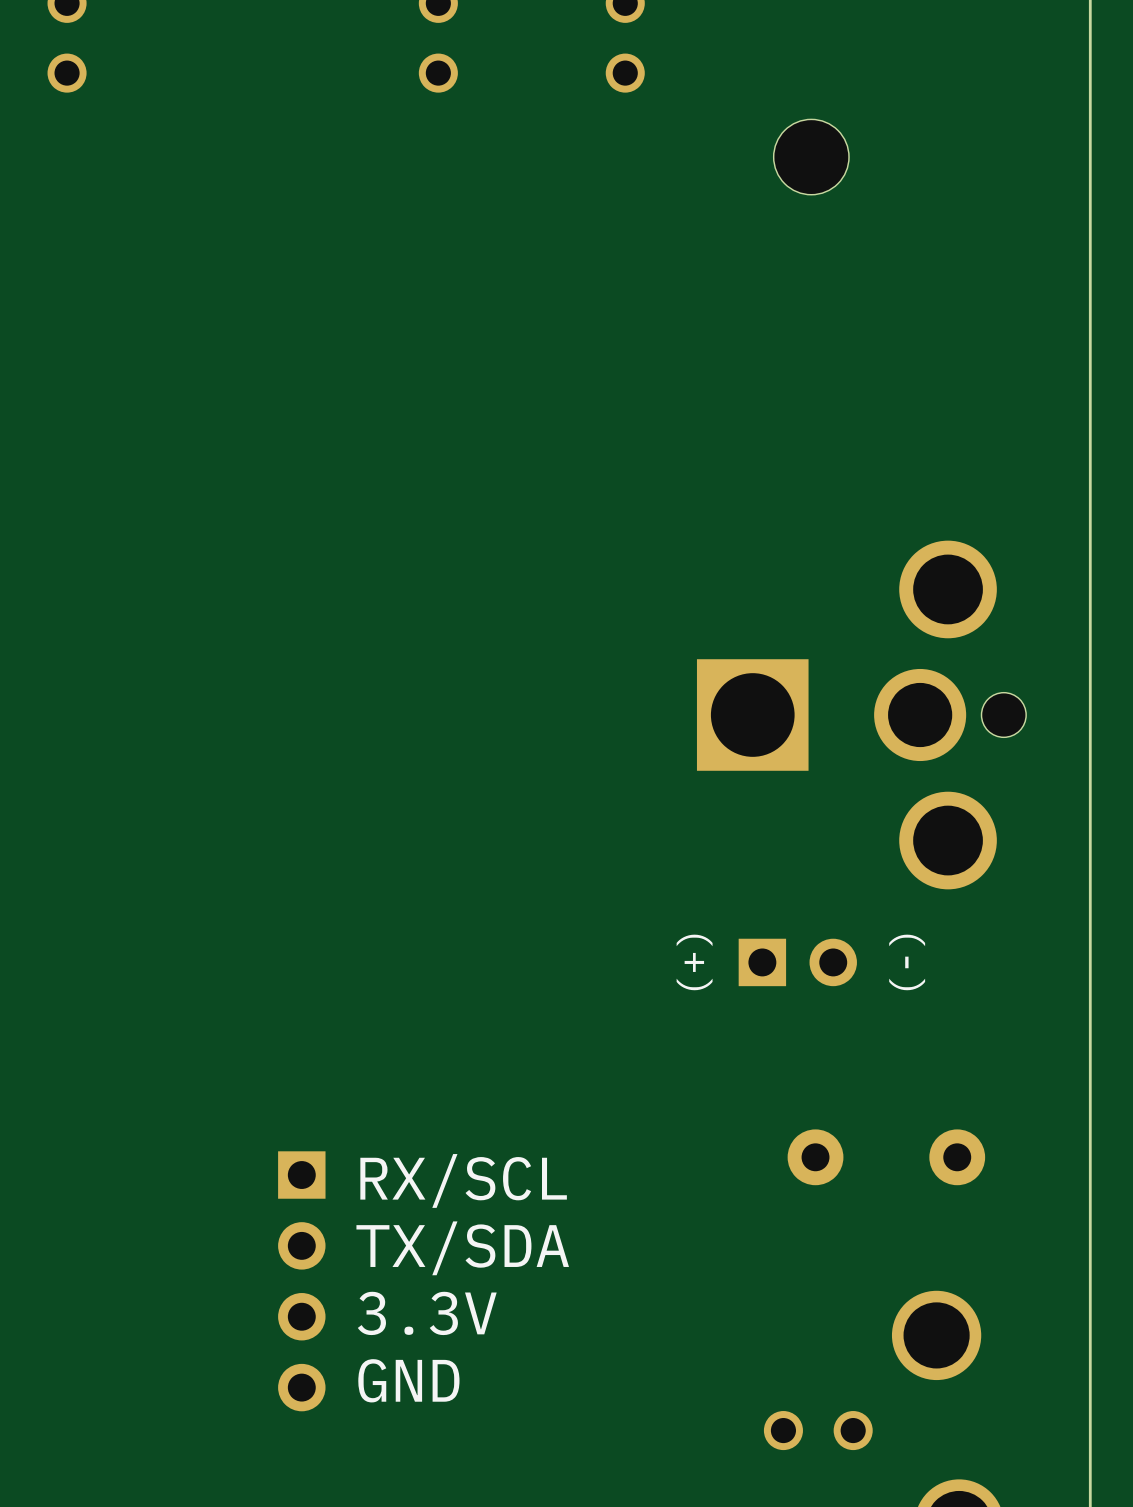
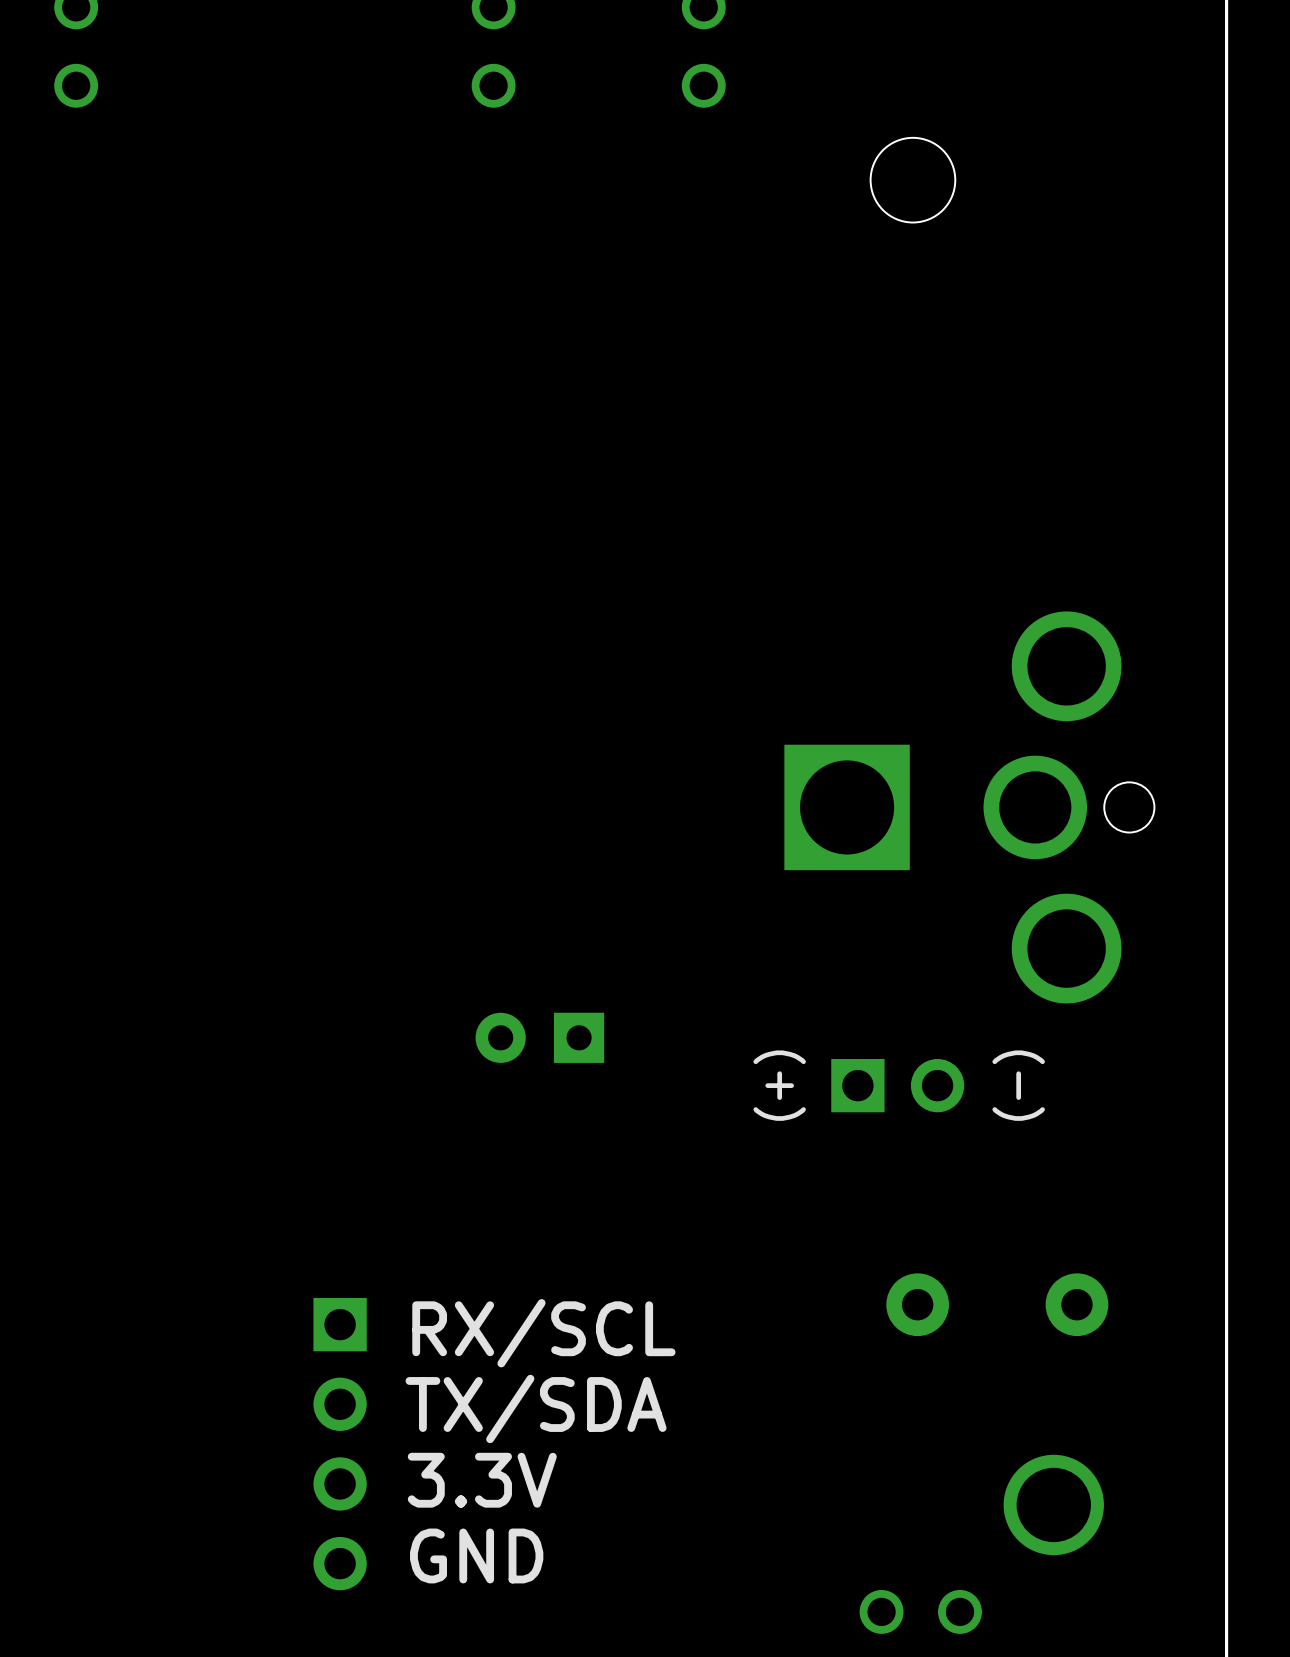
part: none -> (539, 1037)

